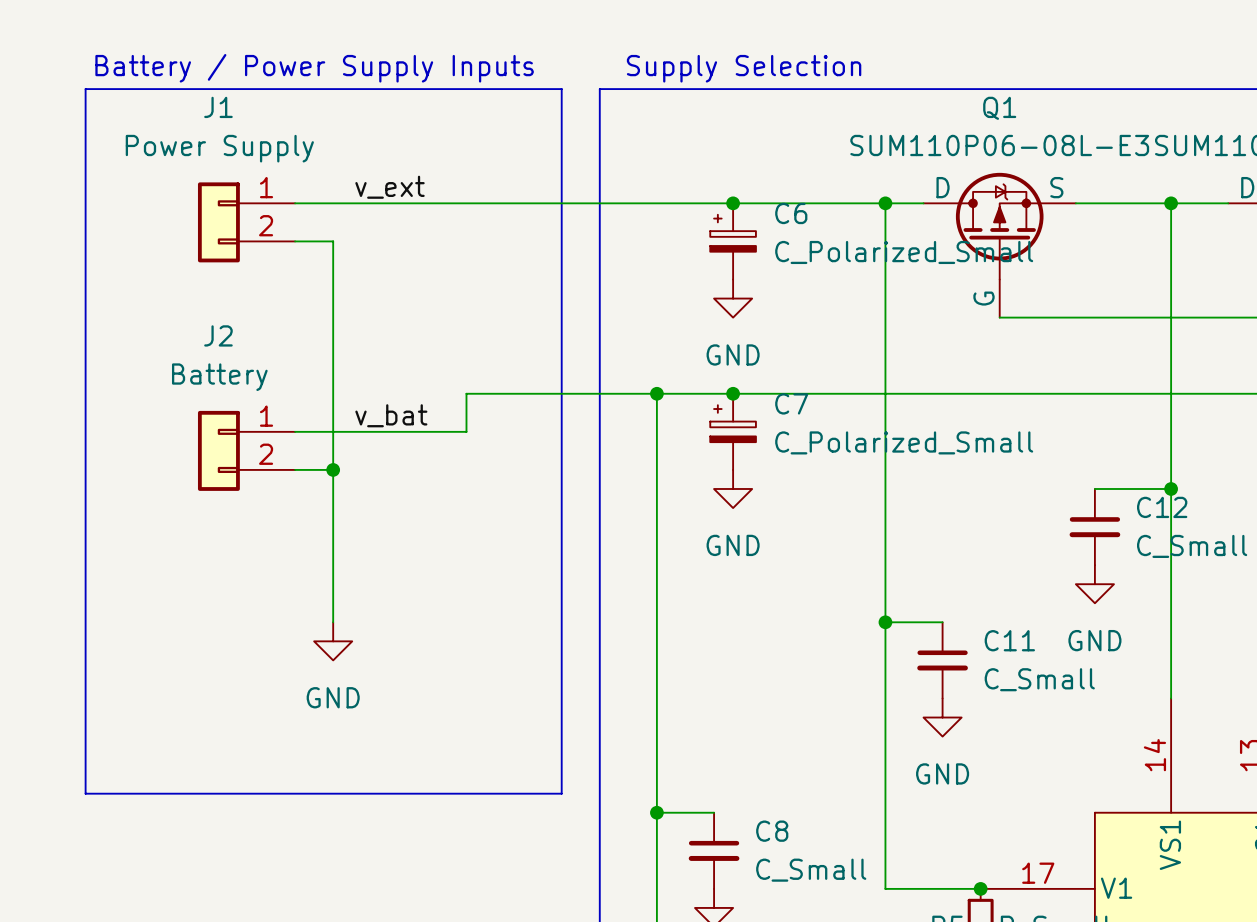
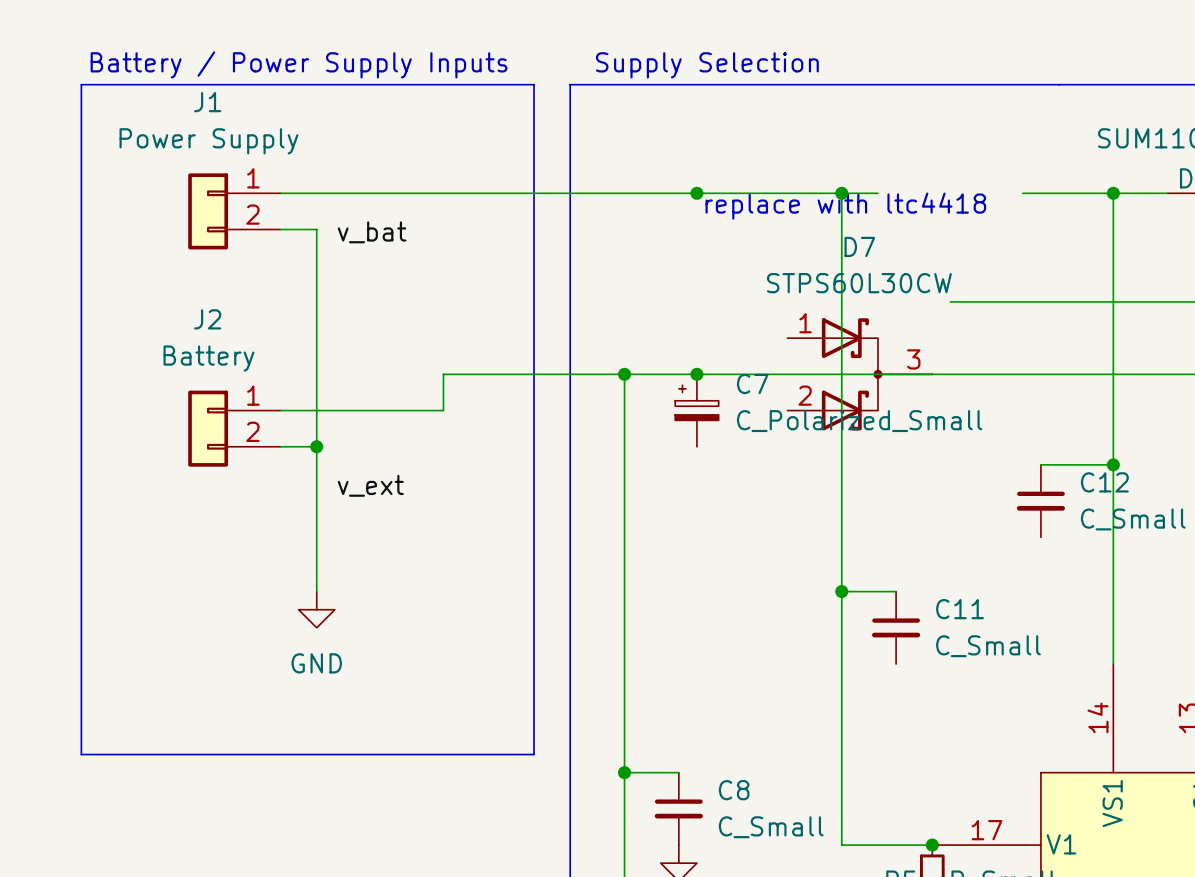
label position: v_ext (390, 187) -> v_ext (370, 485)
text: none -> replace with ltc4418 (845, 206)
C6: C_Polarized_Small (733, 241) -> none
Q1: SUM110P06-08L-E3 (999, 245) -> none
power symbol: GND (733, 298) -> none
D7: none -> STPS60L30CW (859, 374)
label position: v_bat (391, 415) -> v_bat (372, 232)
power symbol: GND (733, 488) -> none
power symbol: GND (1094, 584) -> none
power symbol: GND (942, 717) -> none

